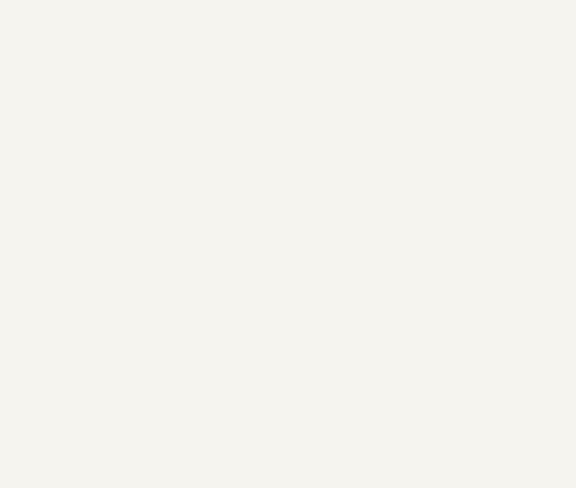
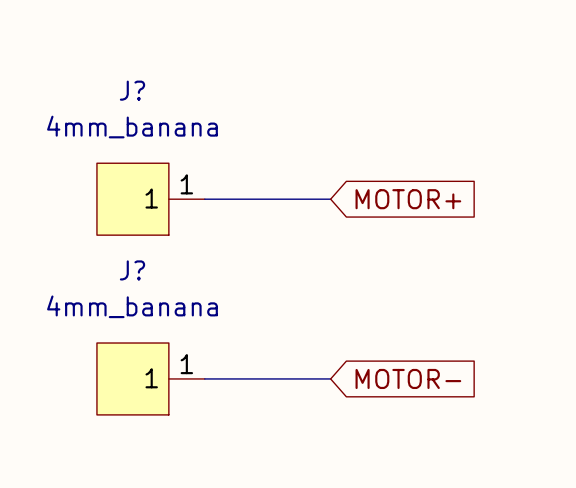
J?: none -> 4mm_banana (150, 199)
wire: none -> (204, 199) (330, 199)
global label: none -> MOTOR+ (408, 199)
J?: none -> 4mm_banana (150, 378)
wire: none -> (204, 378) (330, 378)
global label: none -> MOTOR- (408, 378)

